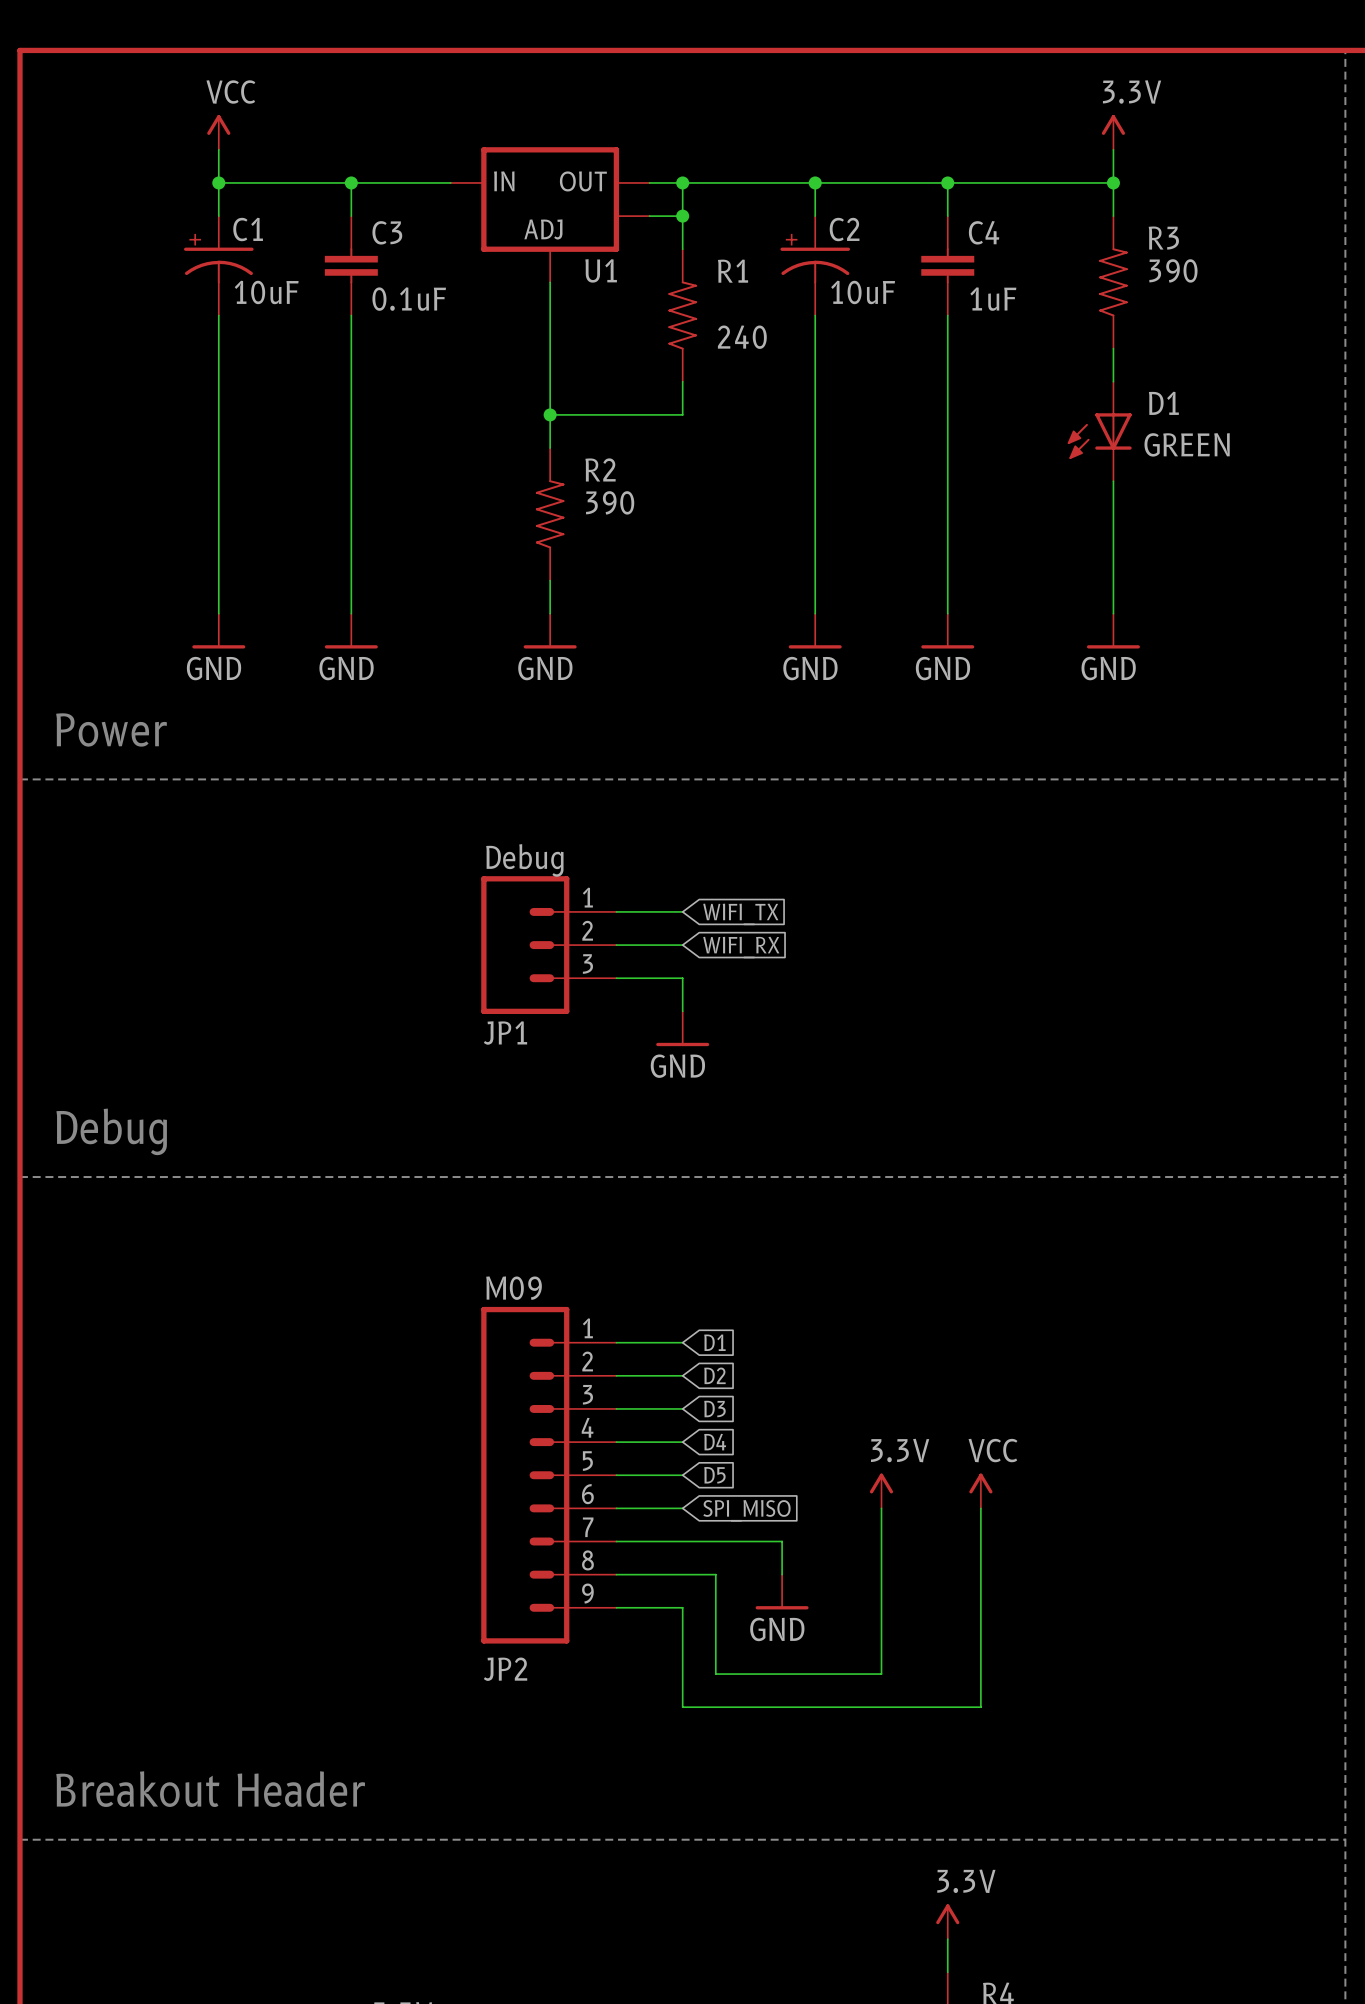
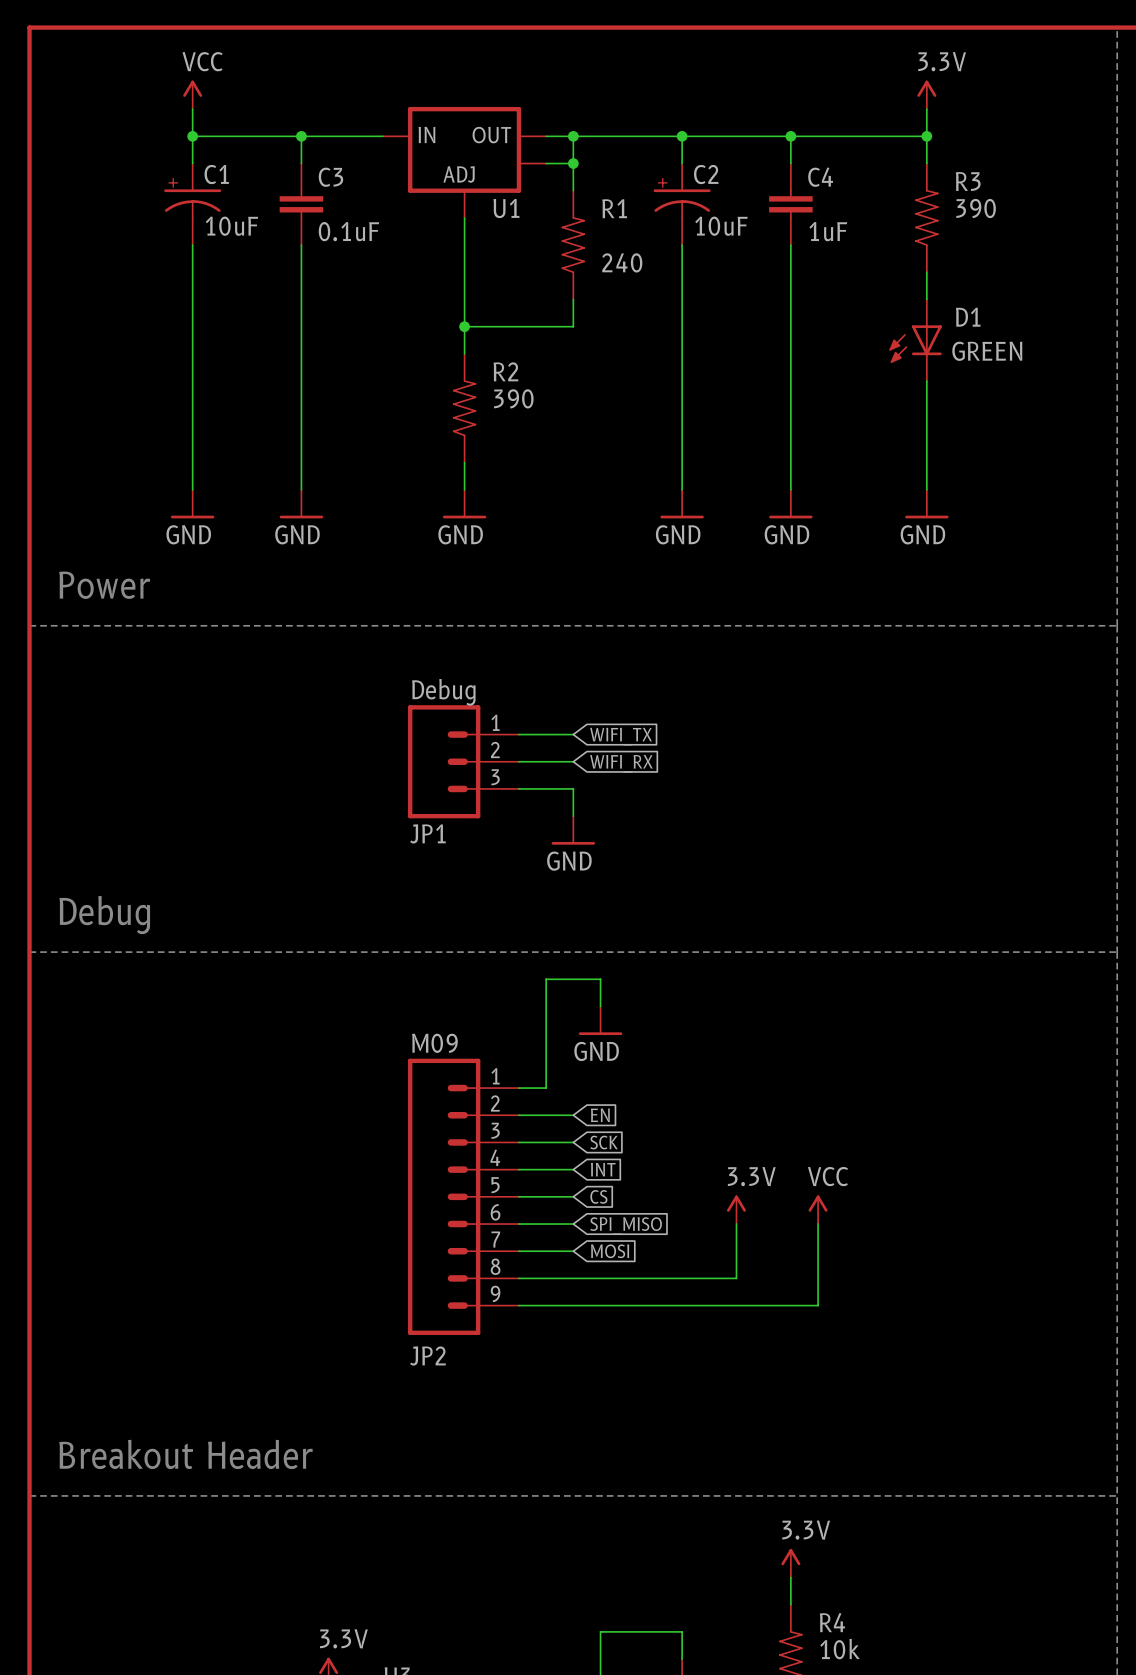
power symbol: none -> GND (600, 1020)
wire: (649, 1342) (682, 1342) -> (546, 1088) (546, 979) (600, 979) (600, 1006)
global label: D1 (714, 1342) -> none
global label: D2 (714, 1375) -> EN (600, 1115)
global label: D3 (714, 1409) -> SCK (604, 1142)
global label: D4 (715, 1442) -> INT (603, 1169)
global label: D5 (714, 1475) -> CS (598, 1196)
wire: (682, 1541) (782, 1541) (782, 1574) -> none
global label: none -> MOSI (610, 1251)
wire: (715, 1574) (715, 1674) (881, 1674) (881, 1574) -> (600, 1278) (736, 1278)
power symbol: GND (782, 1592) -> none
wire: (682, 1607) (682, 1707) (980, 1707) (980, 1607) -> (573, 1305) (818, 1305)

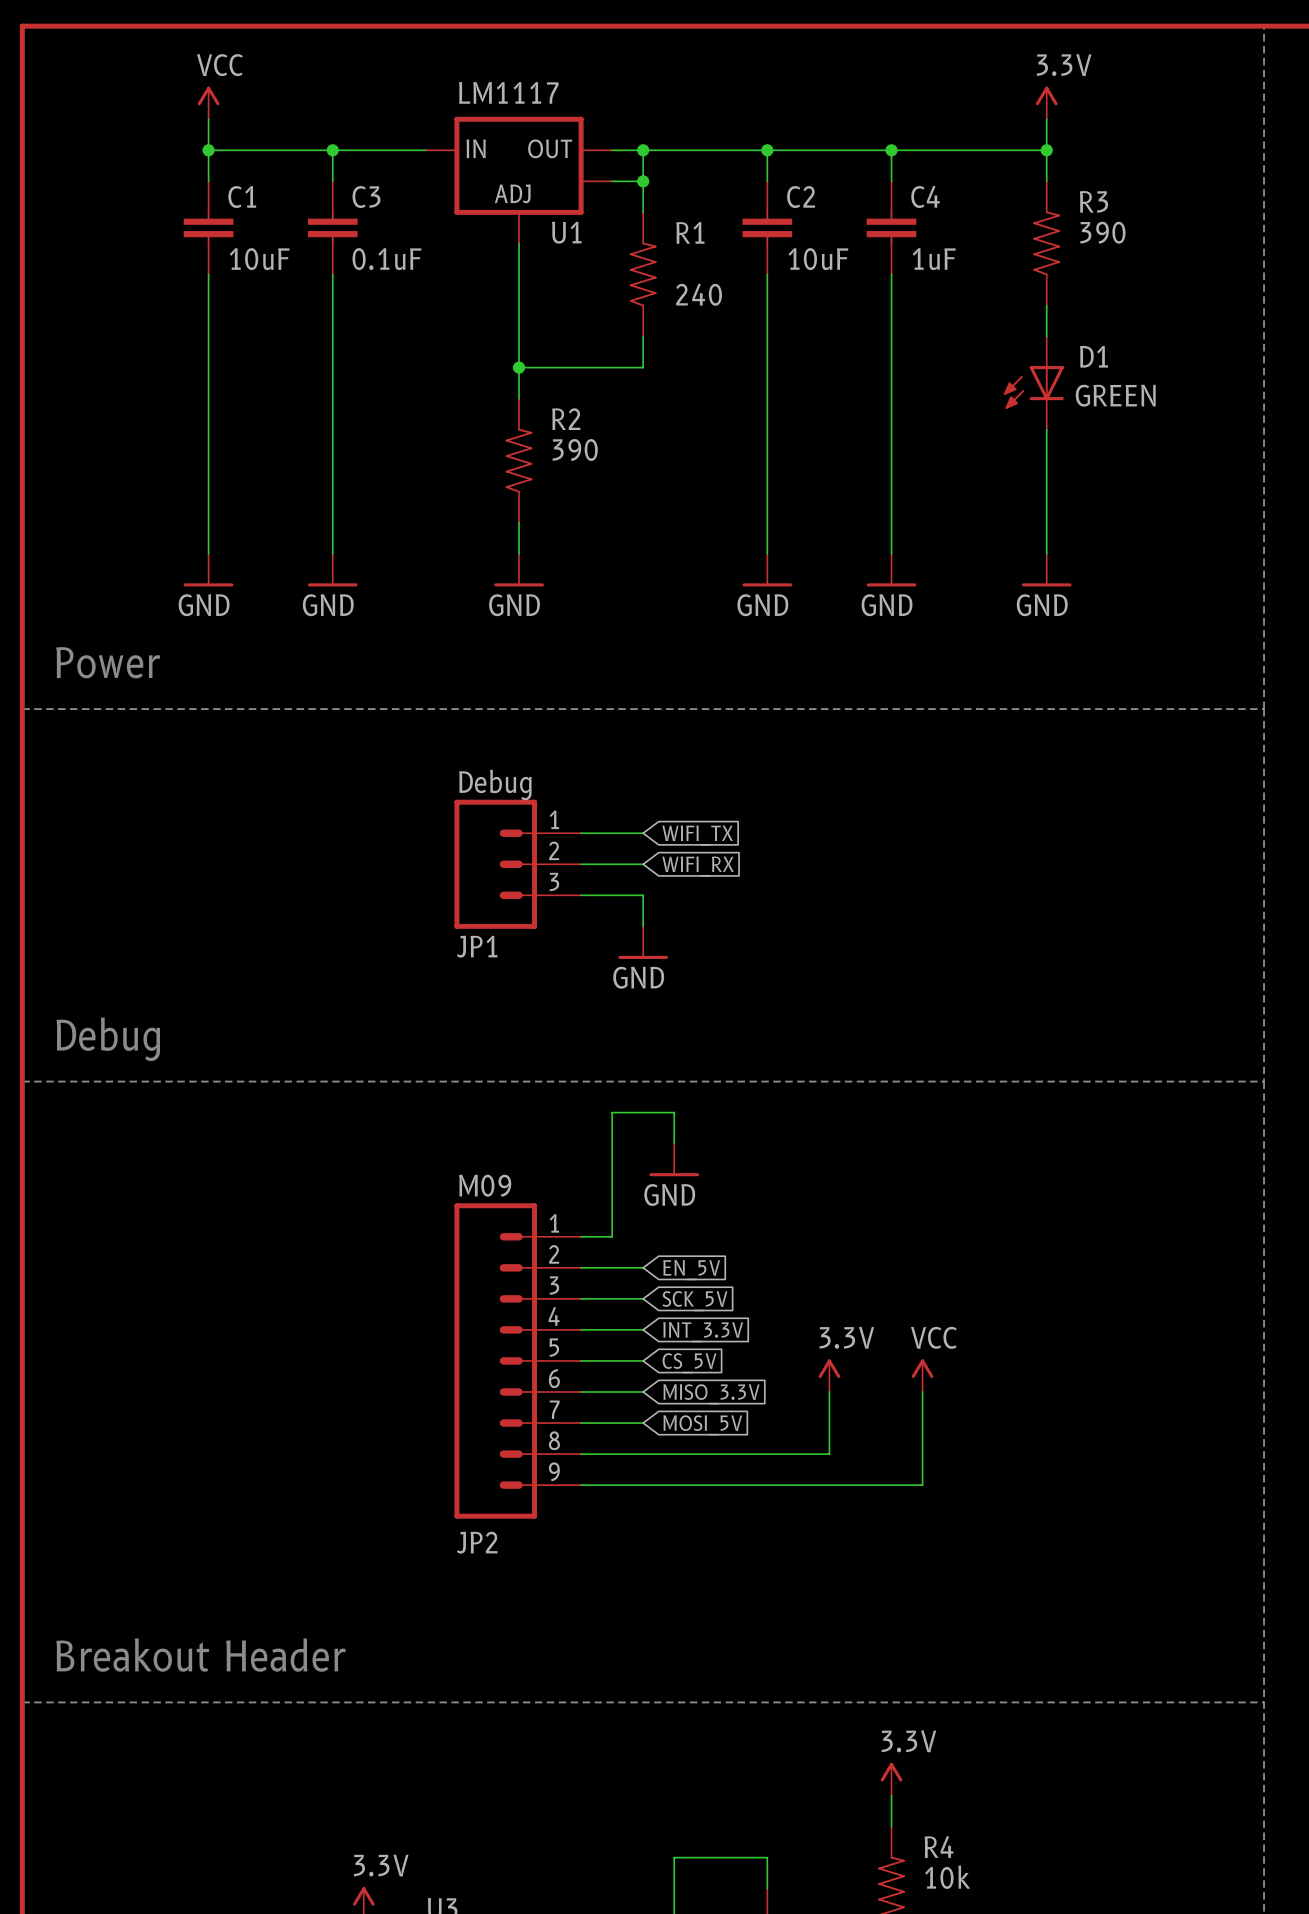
U1 value: none -> LM1117 (508, 92)
C1 symbol: [164, 163, 222, 246] -> [183, 181, 234, 275]
C2 symbol: [653, 163, 711, 246] -> [742, 181, 793, 275]
global label: EN (600, 1115) -> EN_5V (691, 1270)
global label: SCK (604, 1142) -> SCK_5V (694, 1301)
global label: INT (603, 1169) -> INT_3.3V (703, 1332)
global label: CS (598, 1196) -> CS_5V (689, 1363)
global label: SPI_MISO (626, 1226) -> MISO_3.3V (711, 1394)
global label: MOSI (610, 1251) -> MOSI_5V (702, 1425)

